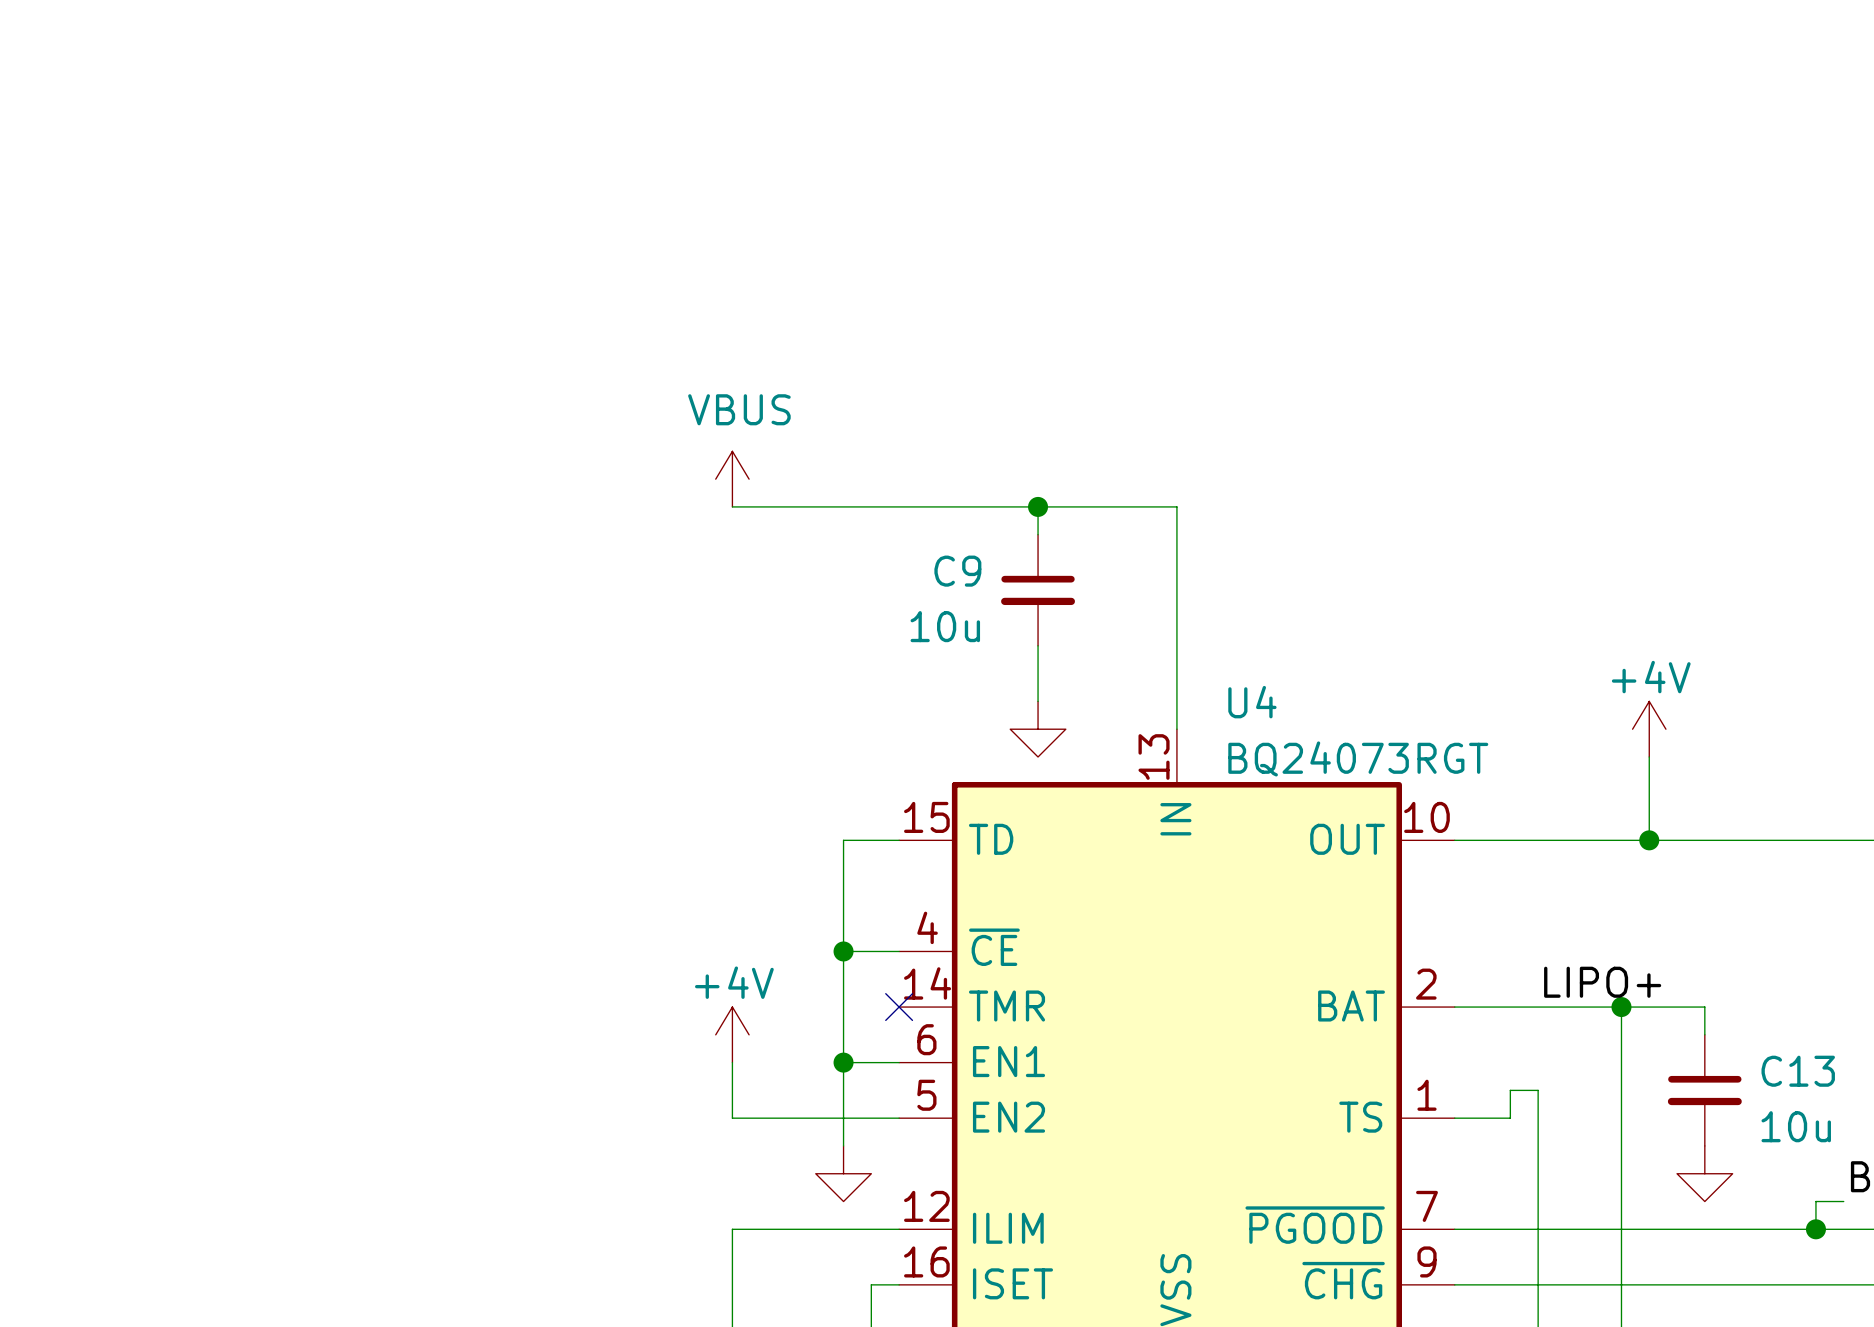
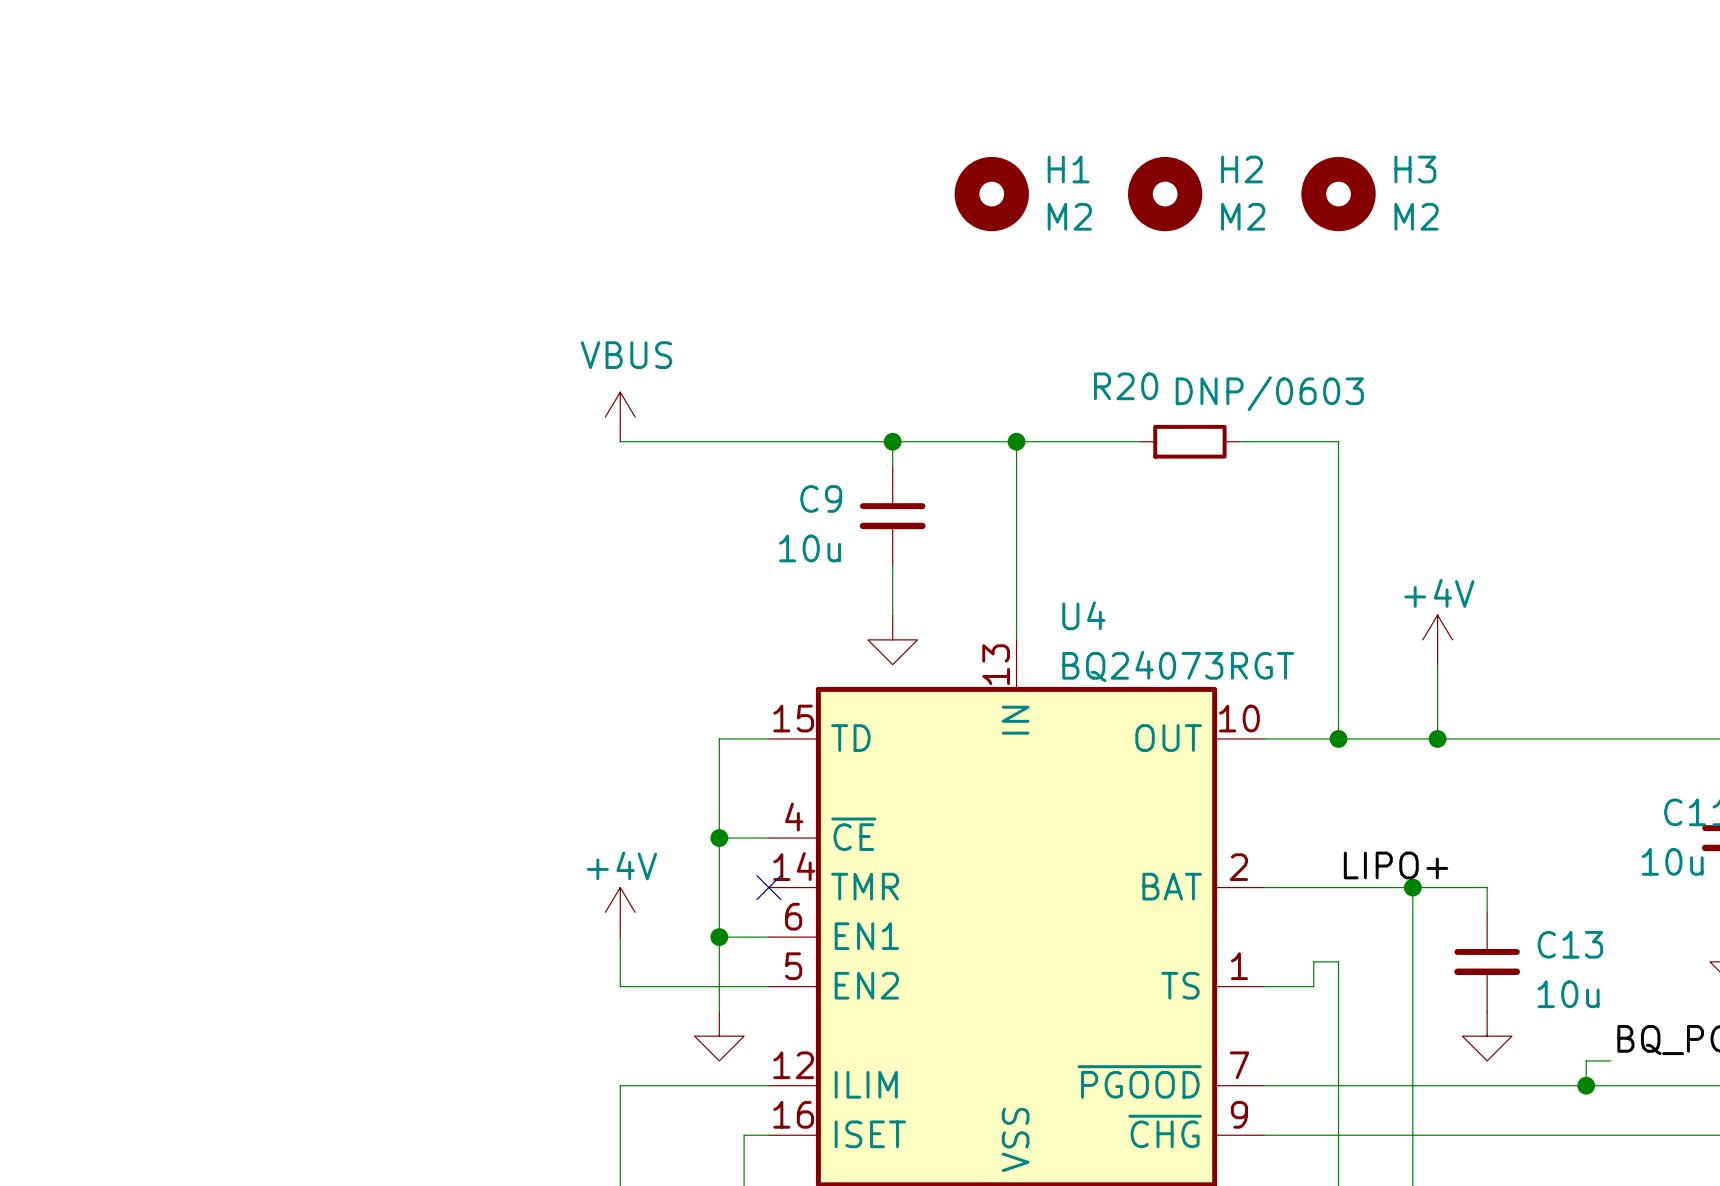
H1: none -> M2 (991, 194)
H2: none -> M2 (1165, 194)
H3: none -> M2 (1338, 194)
wire: none -> (1016, 441) (1140, 441)
junction: none -> (1016, 441)
R20: none -> DNP/0603 (1189, 441)
wire: none -> (1239, 441) (1338, 441) (1338, 738)
junction: none -> (1338, 738)

